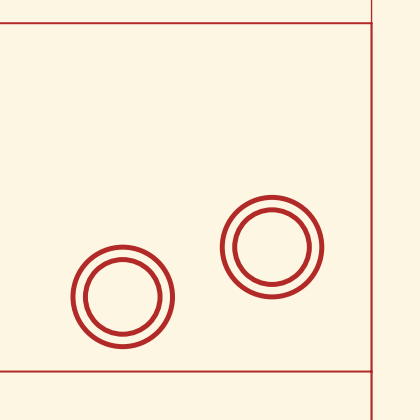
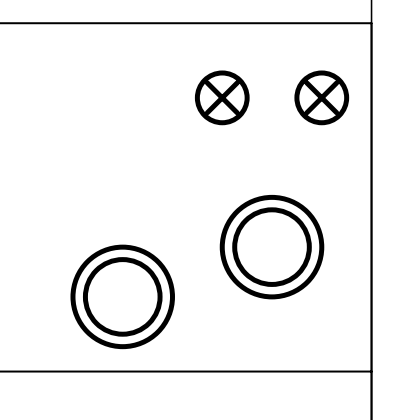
part: none -> (222, 97)
part: none -> (321, 97)

